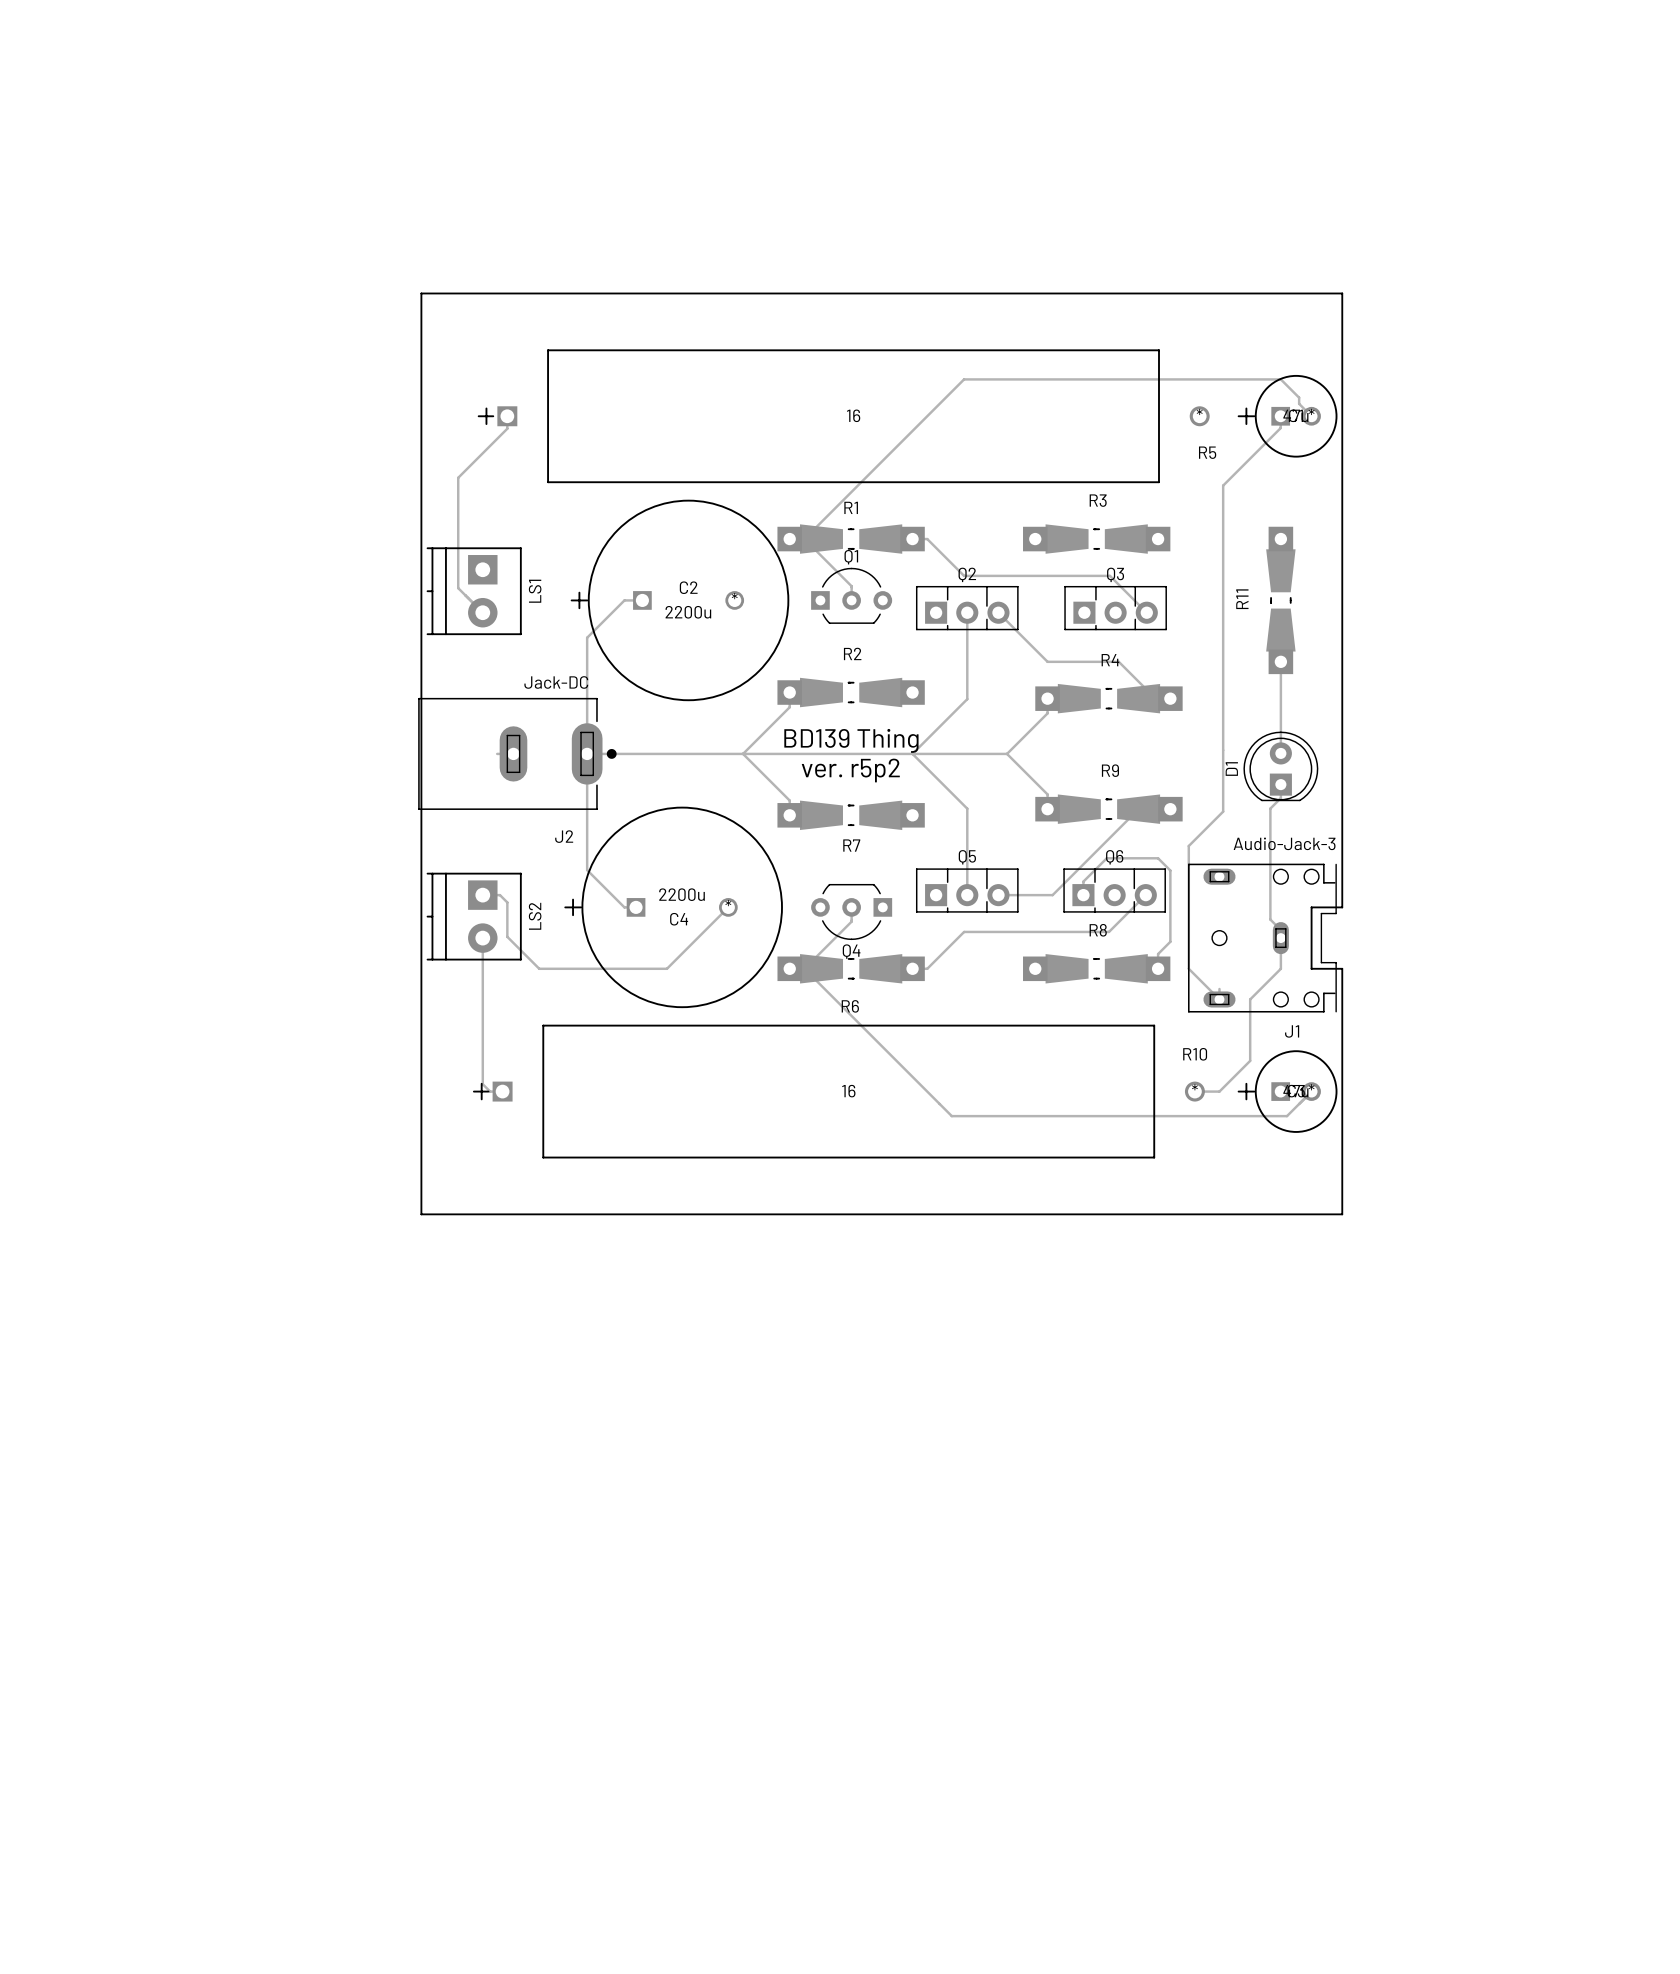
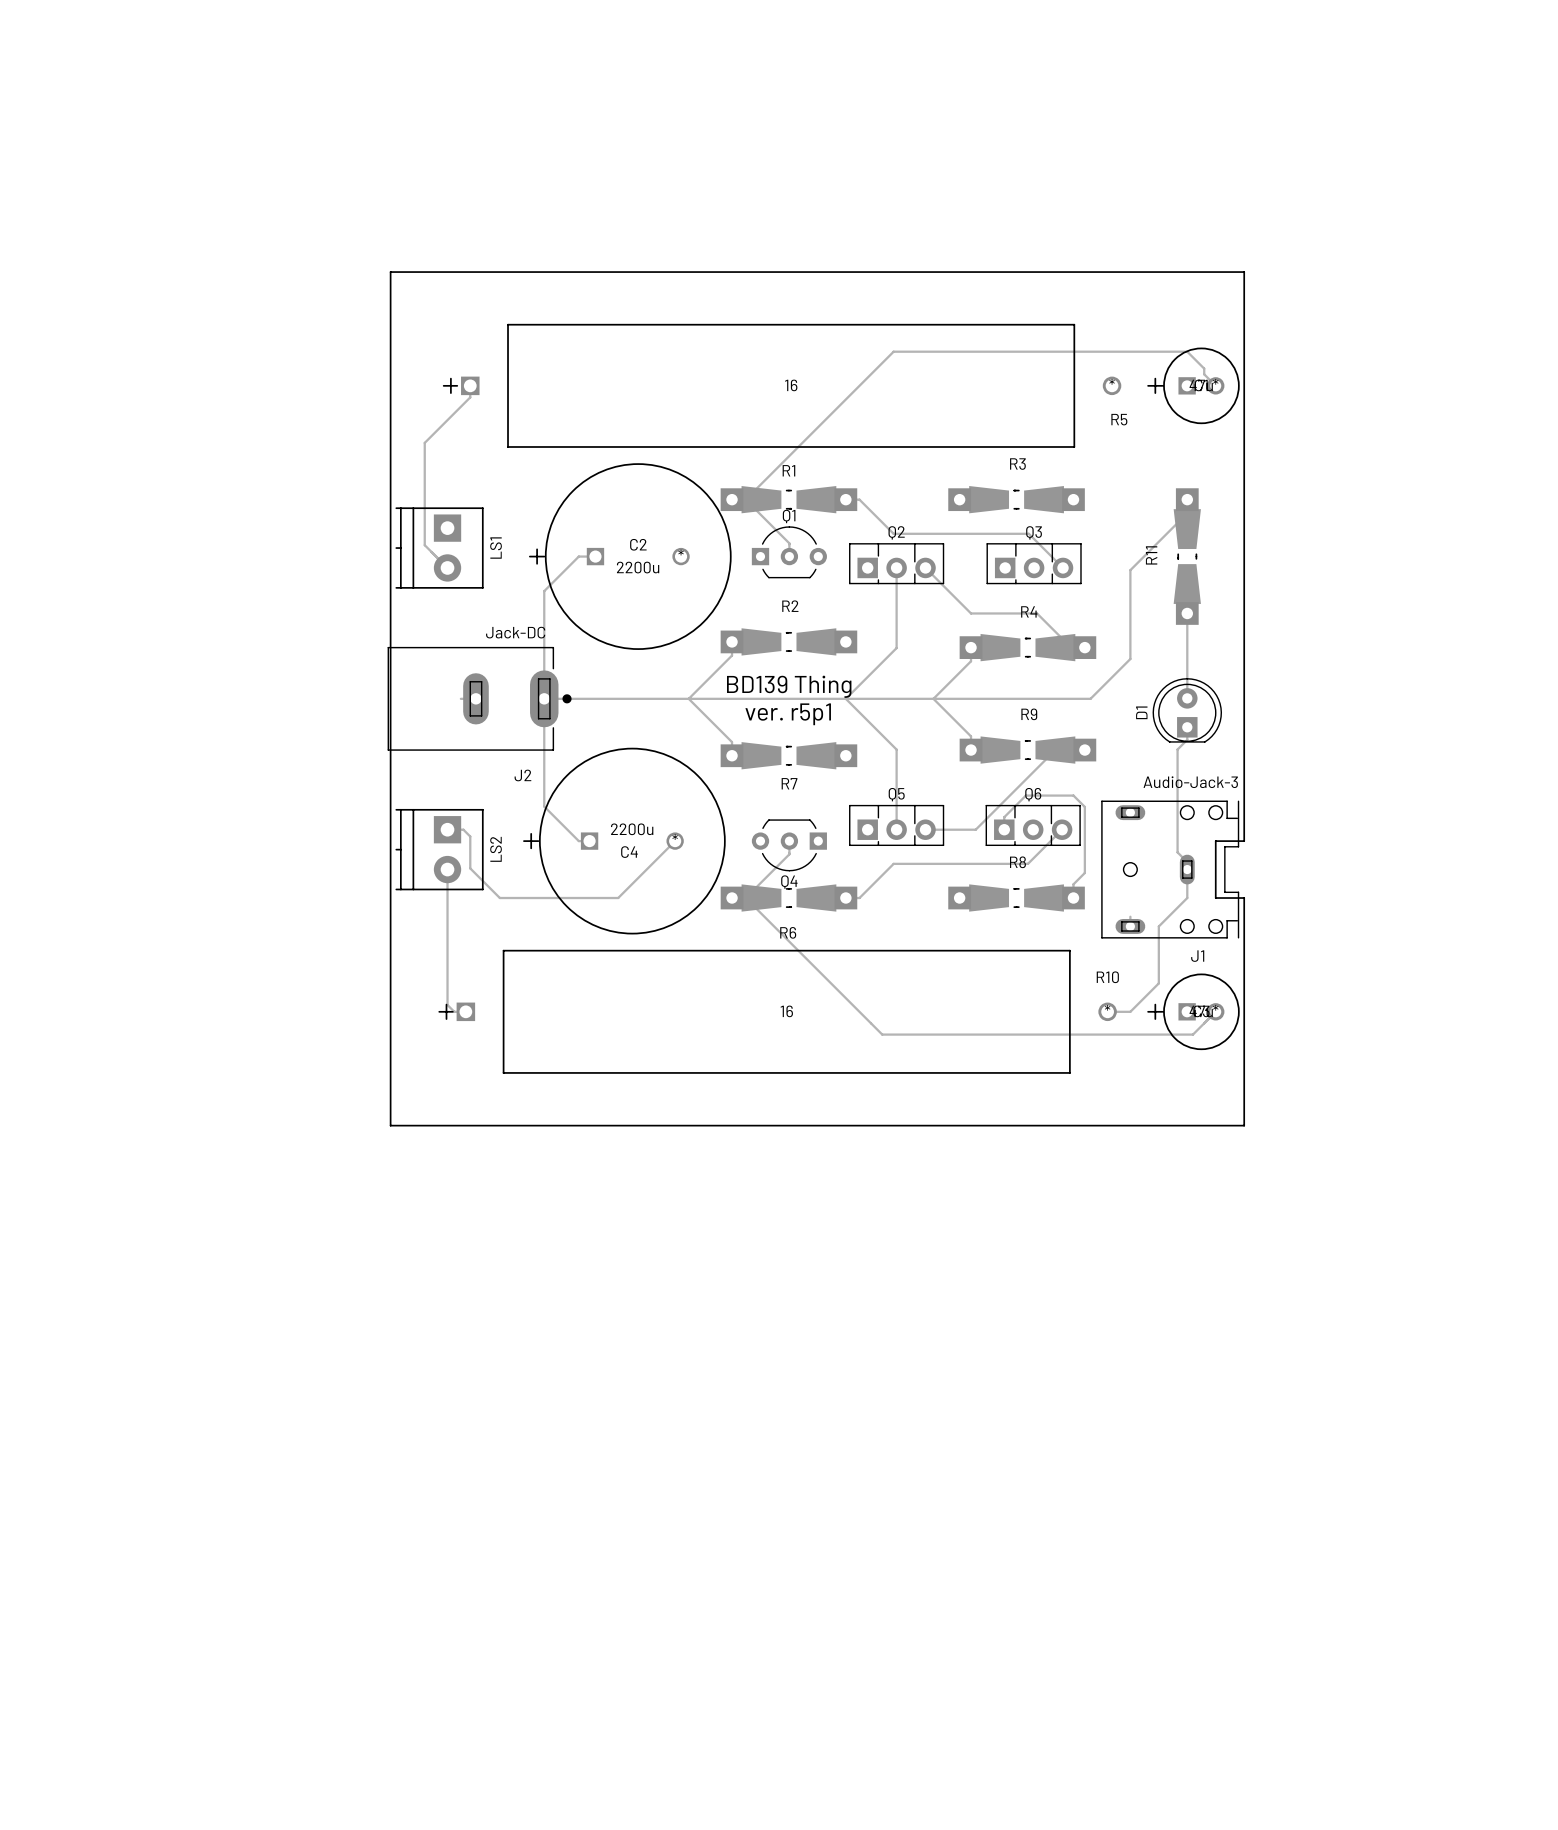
track: (1280, 416) (1280, 428) (1223, 485) (1223, 811) (1188, 846) (1188, 968) (1219, 999) -> none
track: none -> (1187, 513) (1130, 570) (1130, 659) (1090, 698) (933, 698)
text: ver. r5p2 (850, 770) -> ver. r5p1 (788, 714)

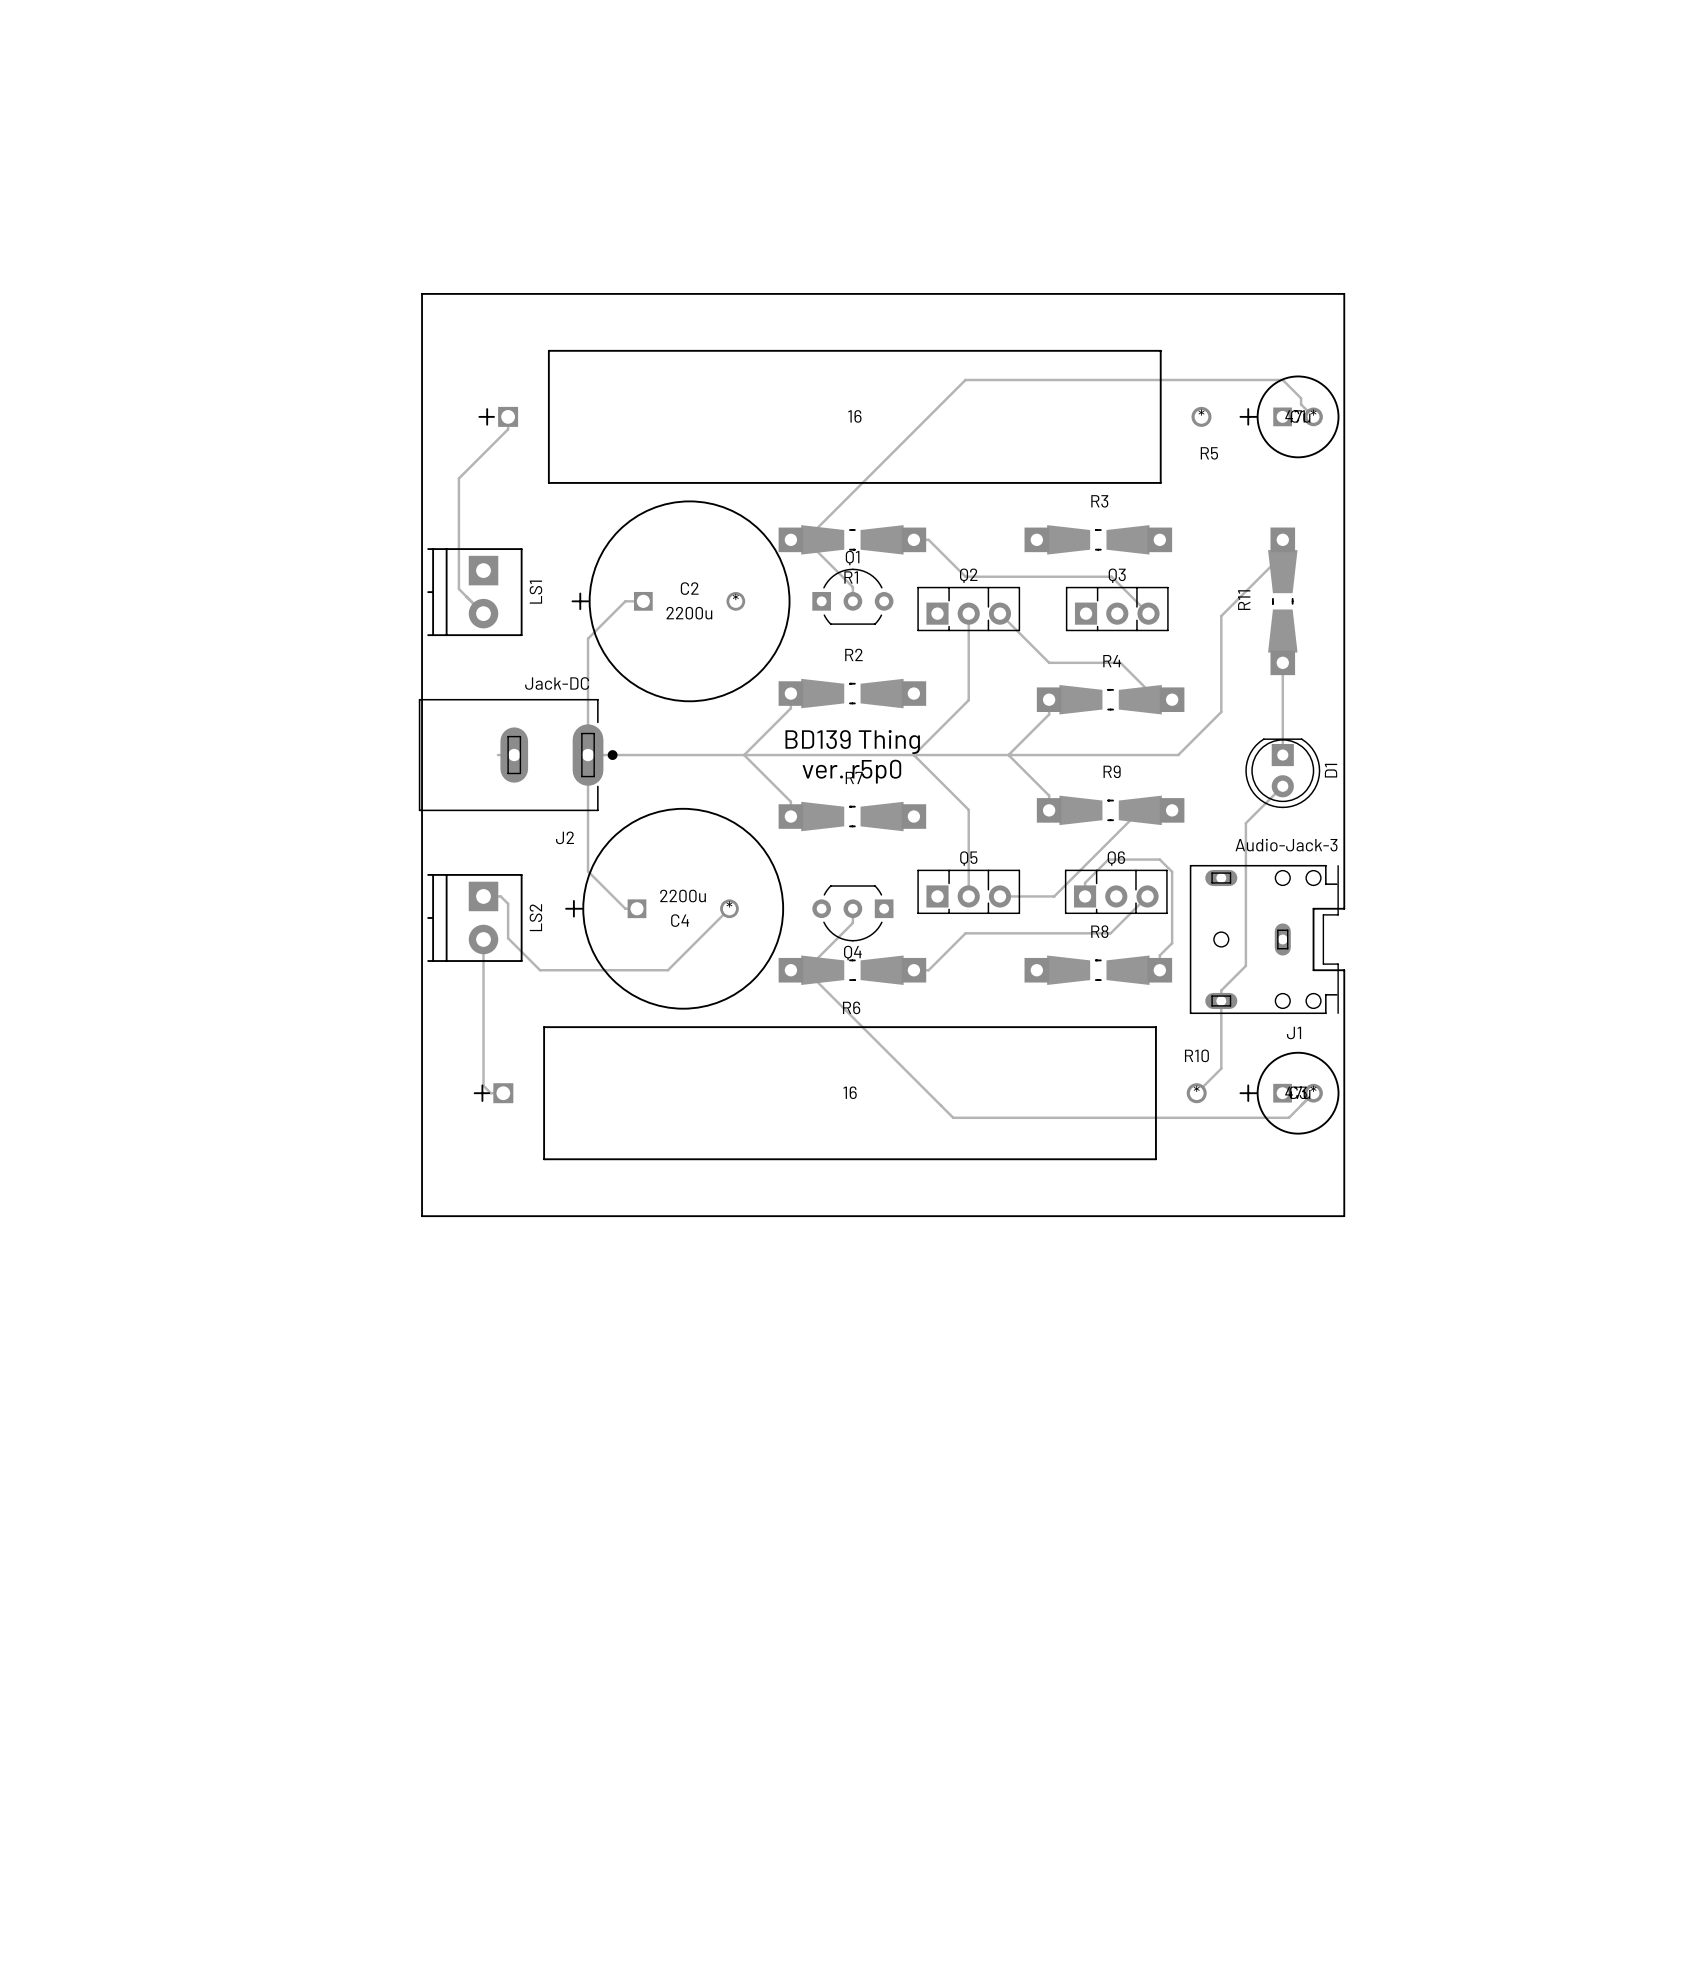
R1 name position: R1 (788, 470) -> R1 (851, 577)
D1 rotation: 0° (1187, 710) -> 180° (1282, 773)
text: ver. r5p1 (788, 714) -> ver. r5p0 (851, 771)
track: (1187, 727) (1187, 739) (1177, 749) (1177, 852) (1187, 862) (1187, 898) (1158, 926) (1158, 983) (1130, 1011) (1107, 1011) -> (1282, 786) (1245, 823) (1245, 965) (1221, 990)
R7 name position: R7 (789, 783) -> R7 (854, 777)
track: none -> (1221, 1000) (1221, 1068) (1196, 1093)

